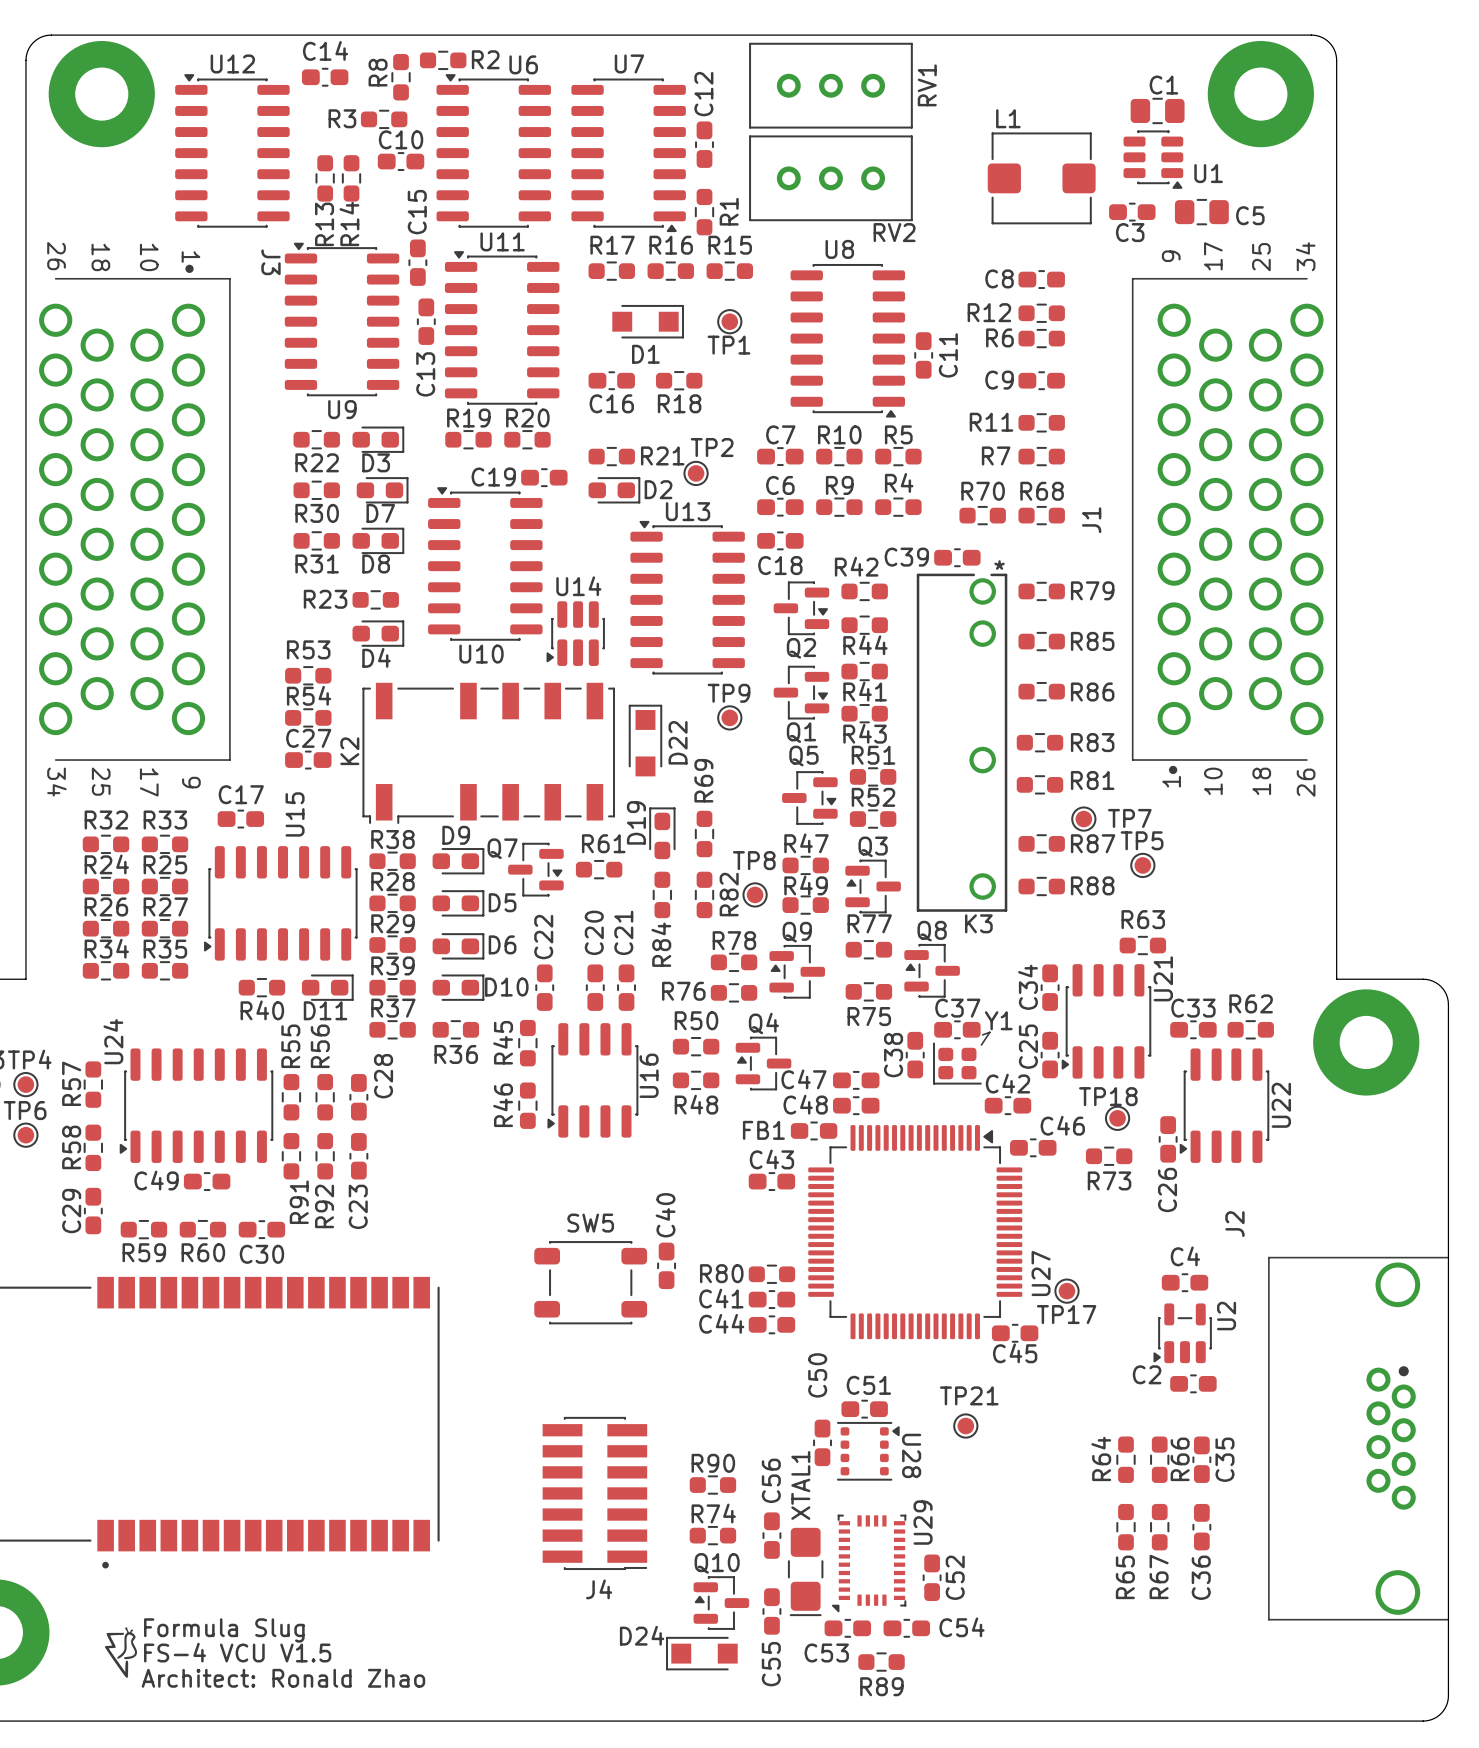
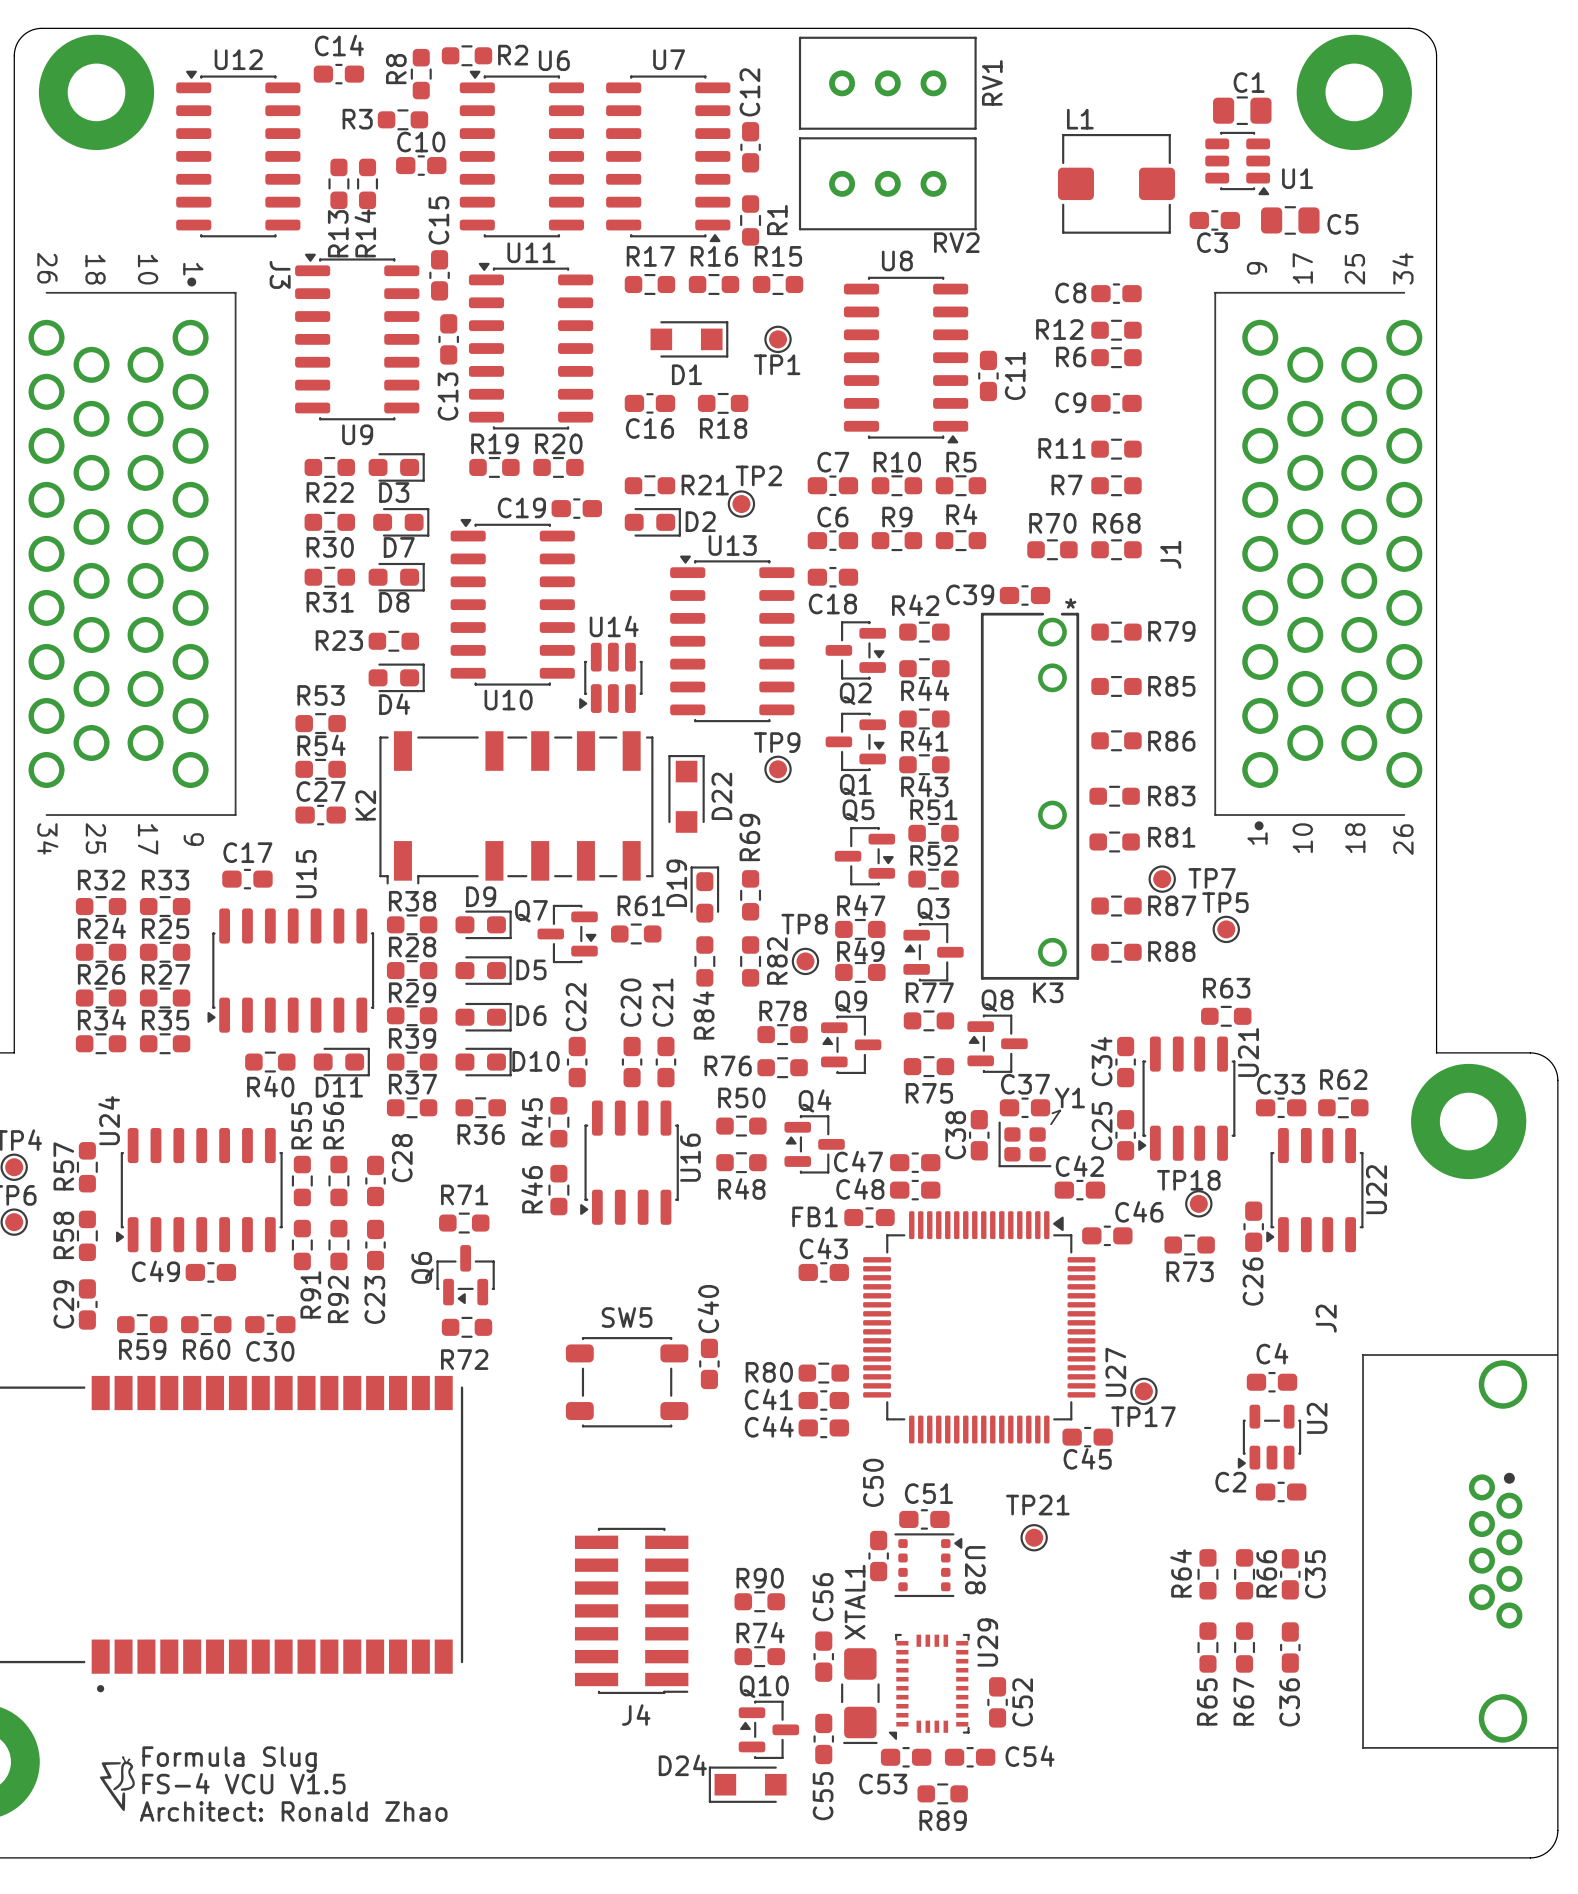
R71: none -> (464, 1223)
Q6: none -> (465, 1275)
R72: none -> (467, 1327)

